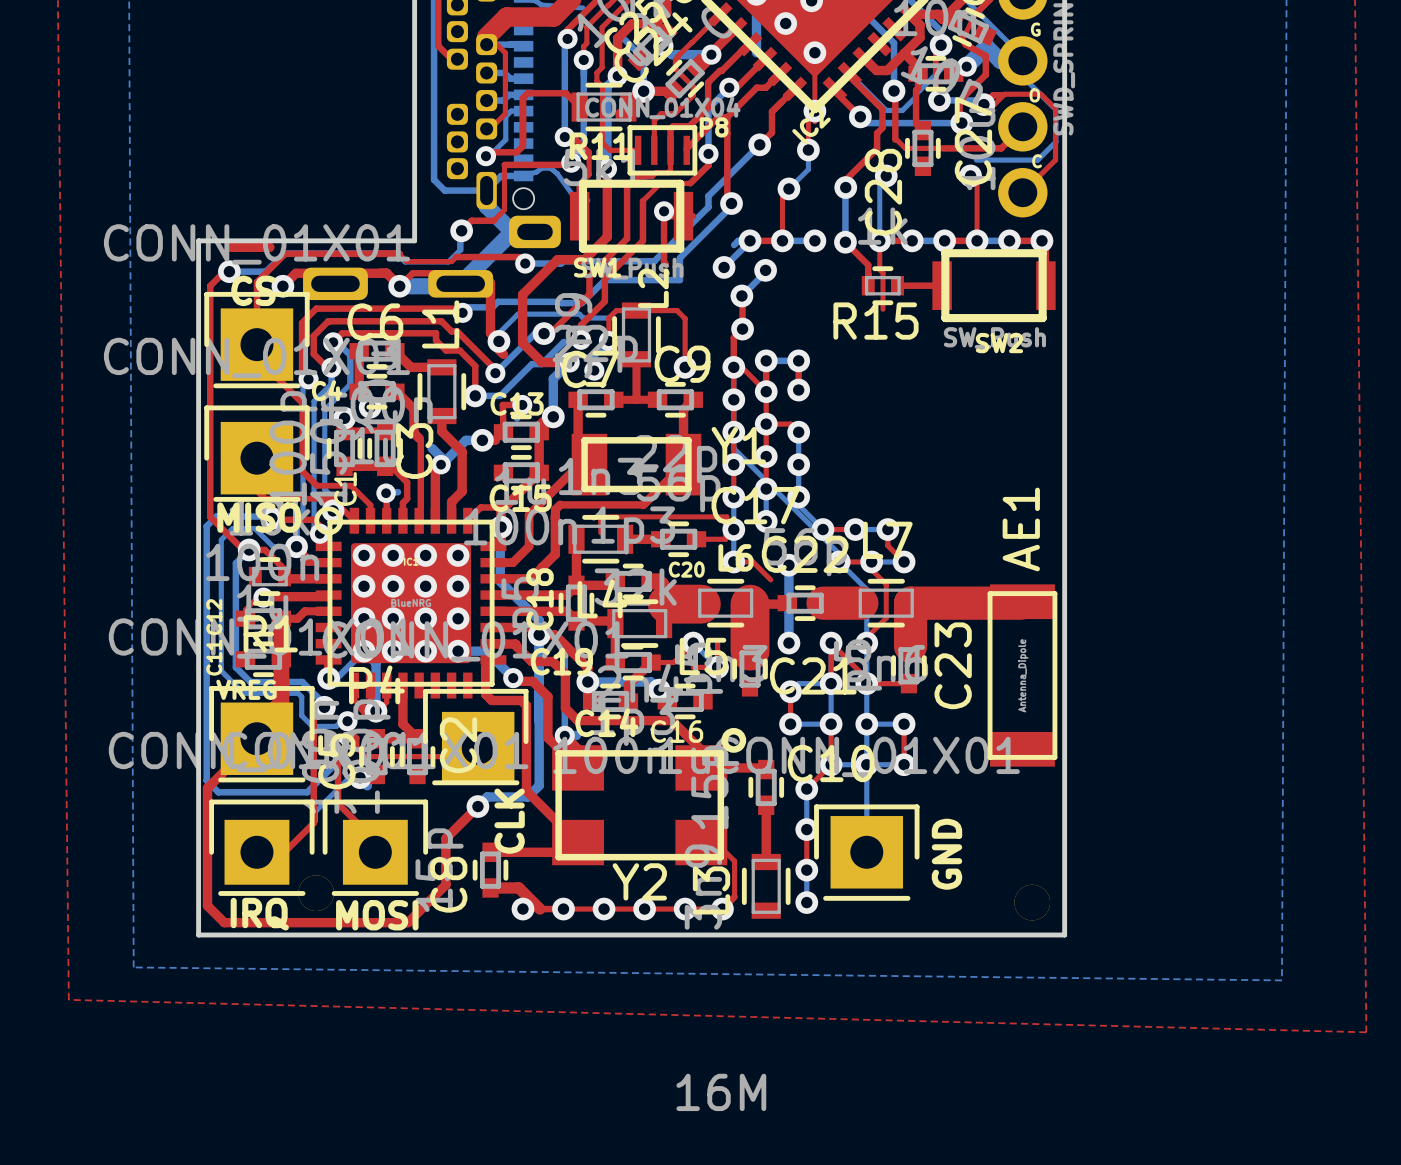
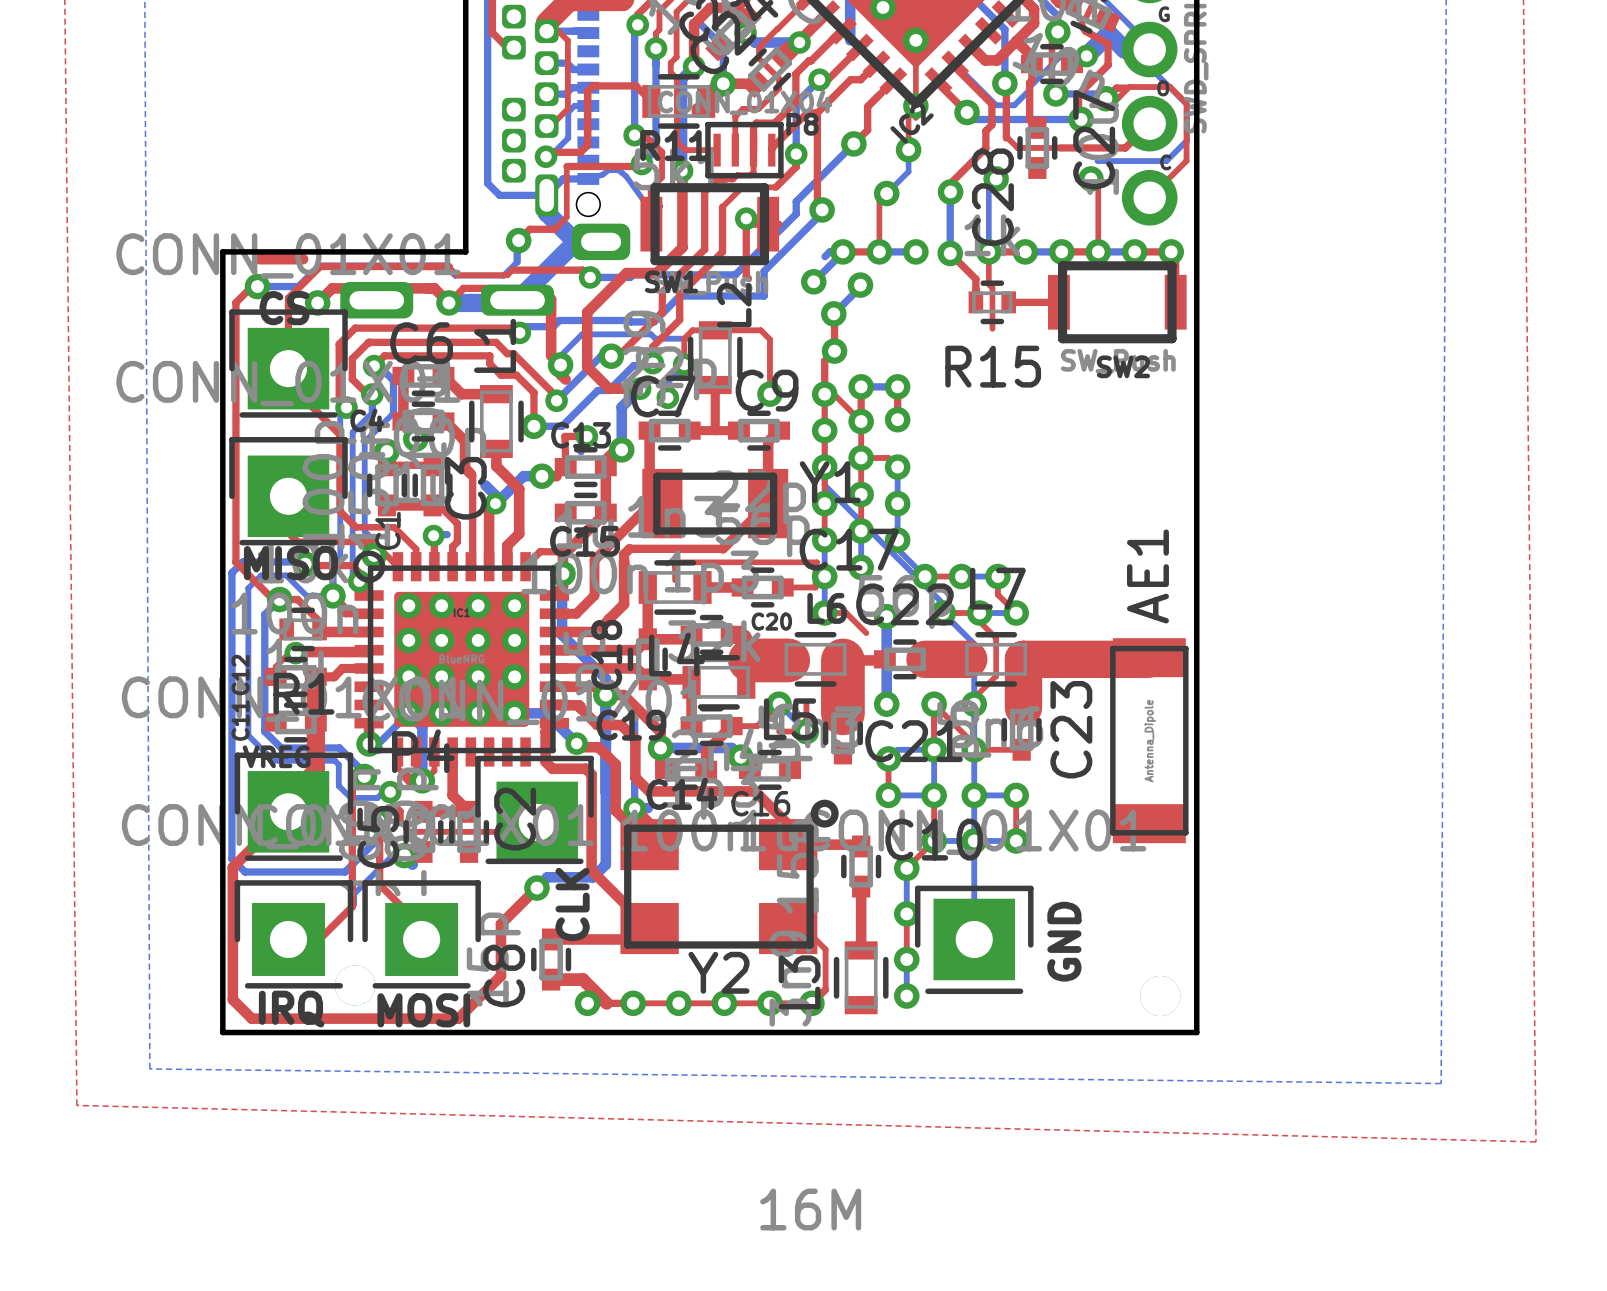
R15 name position: R15 (875, 321) -> R15 (993, 366)

